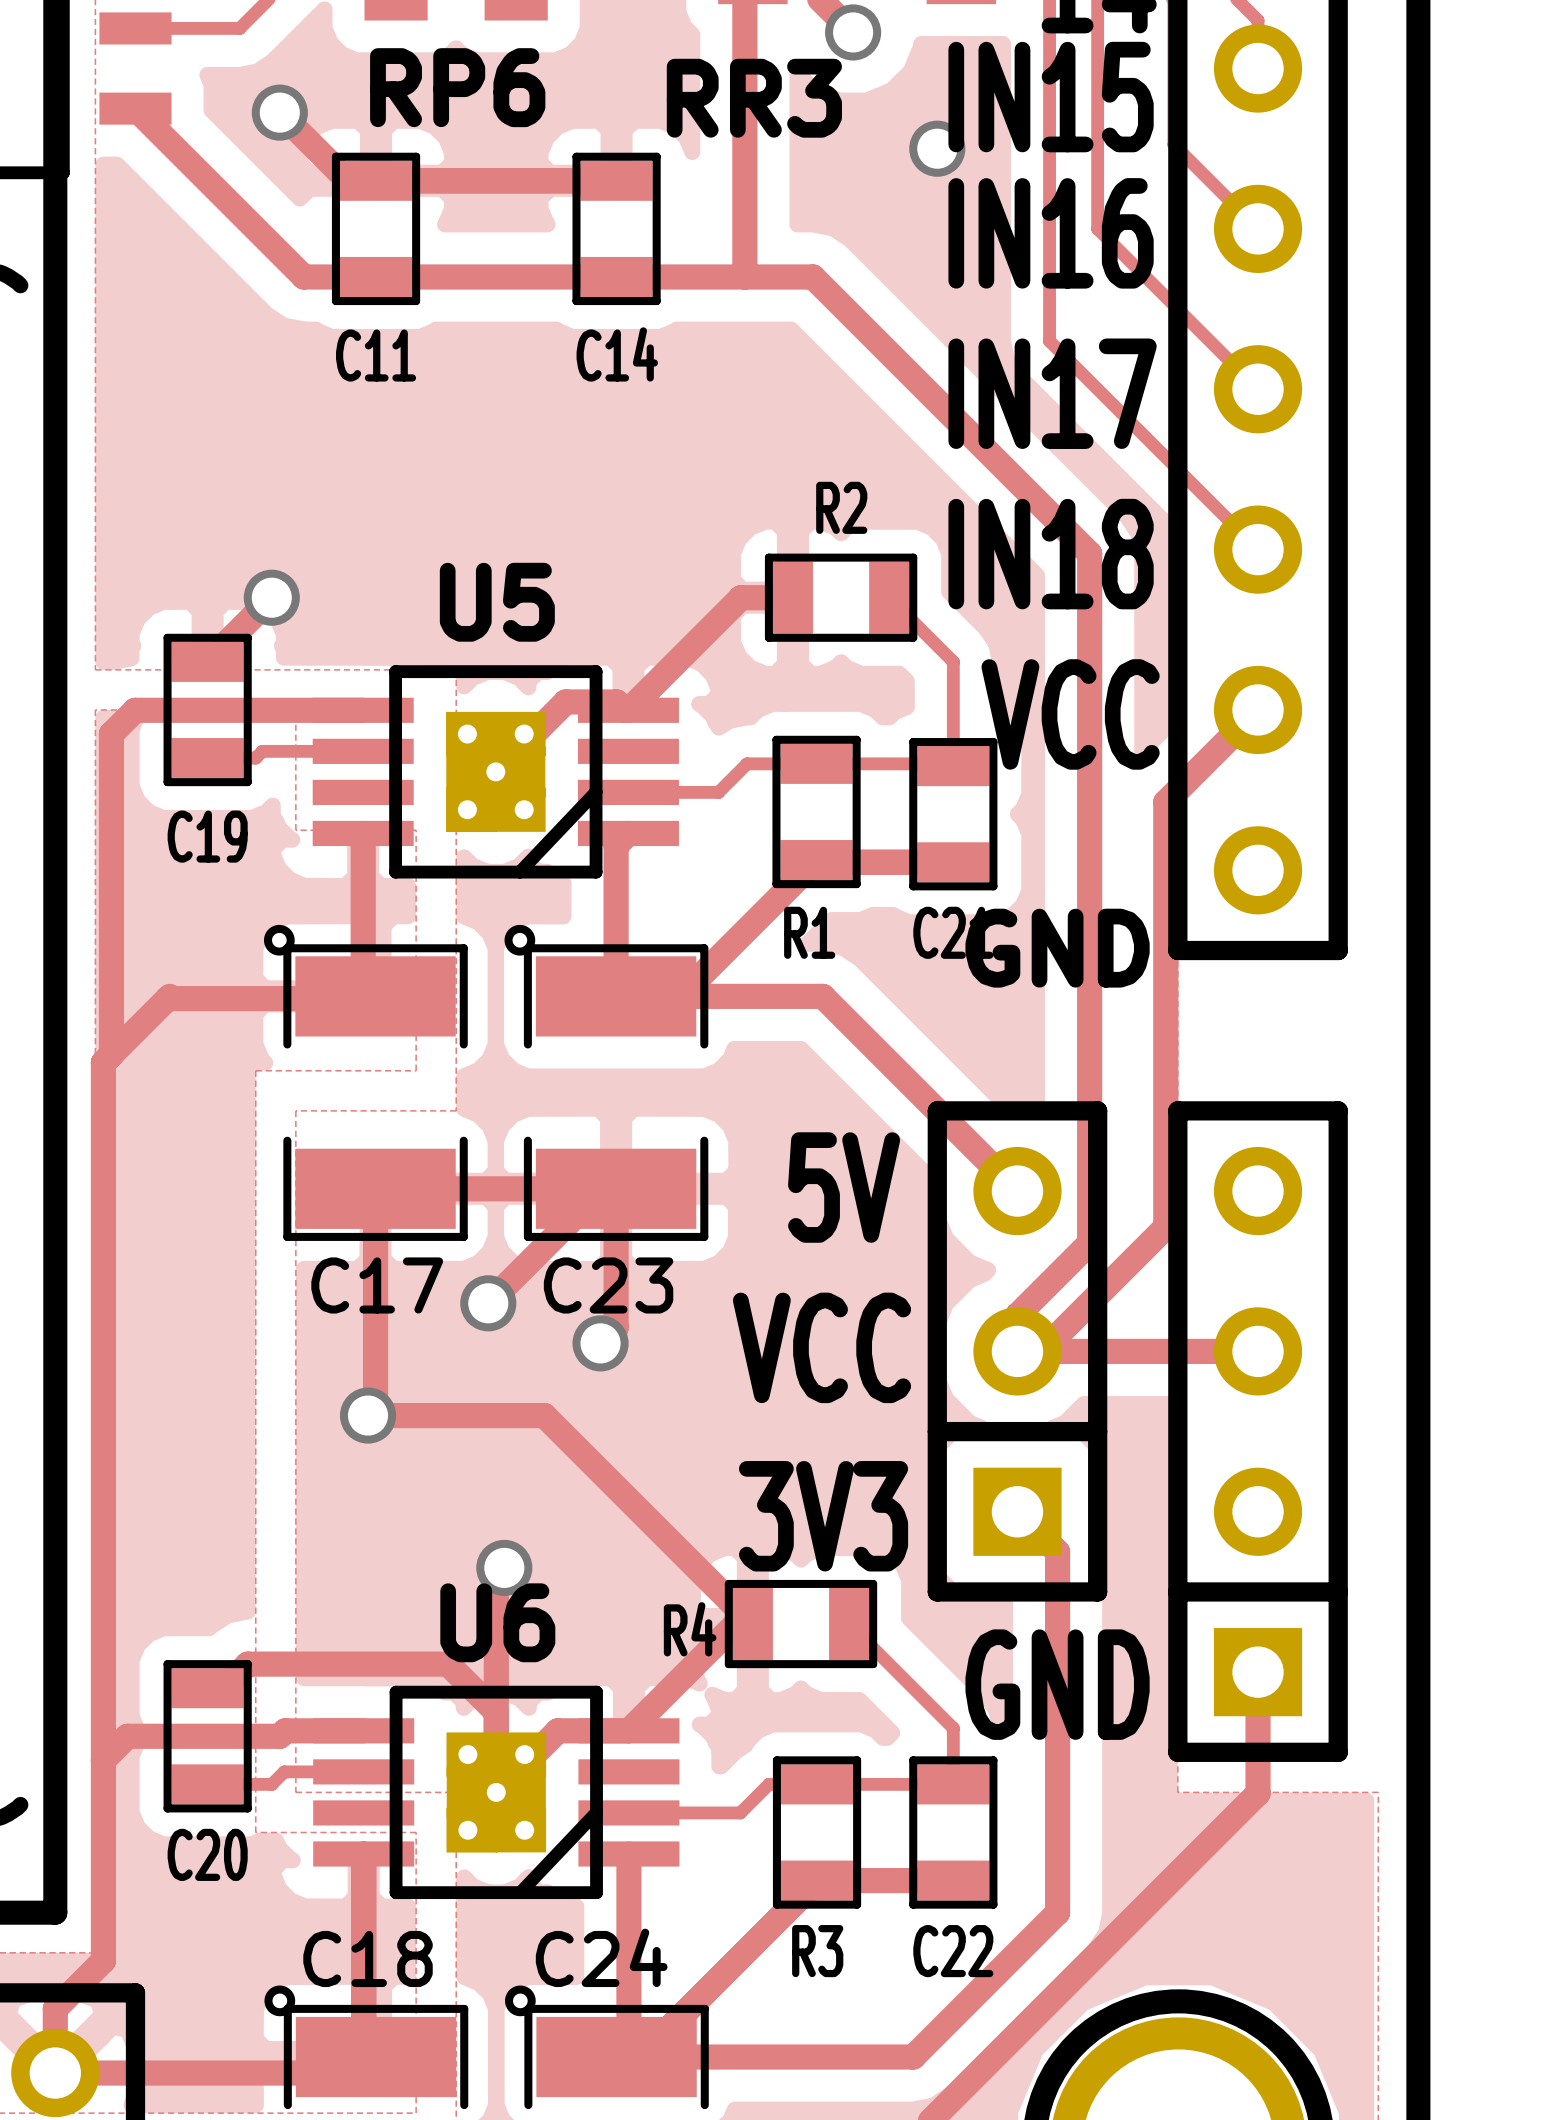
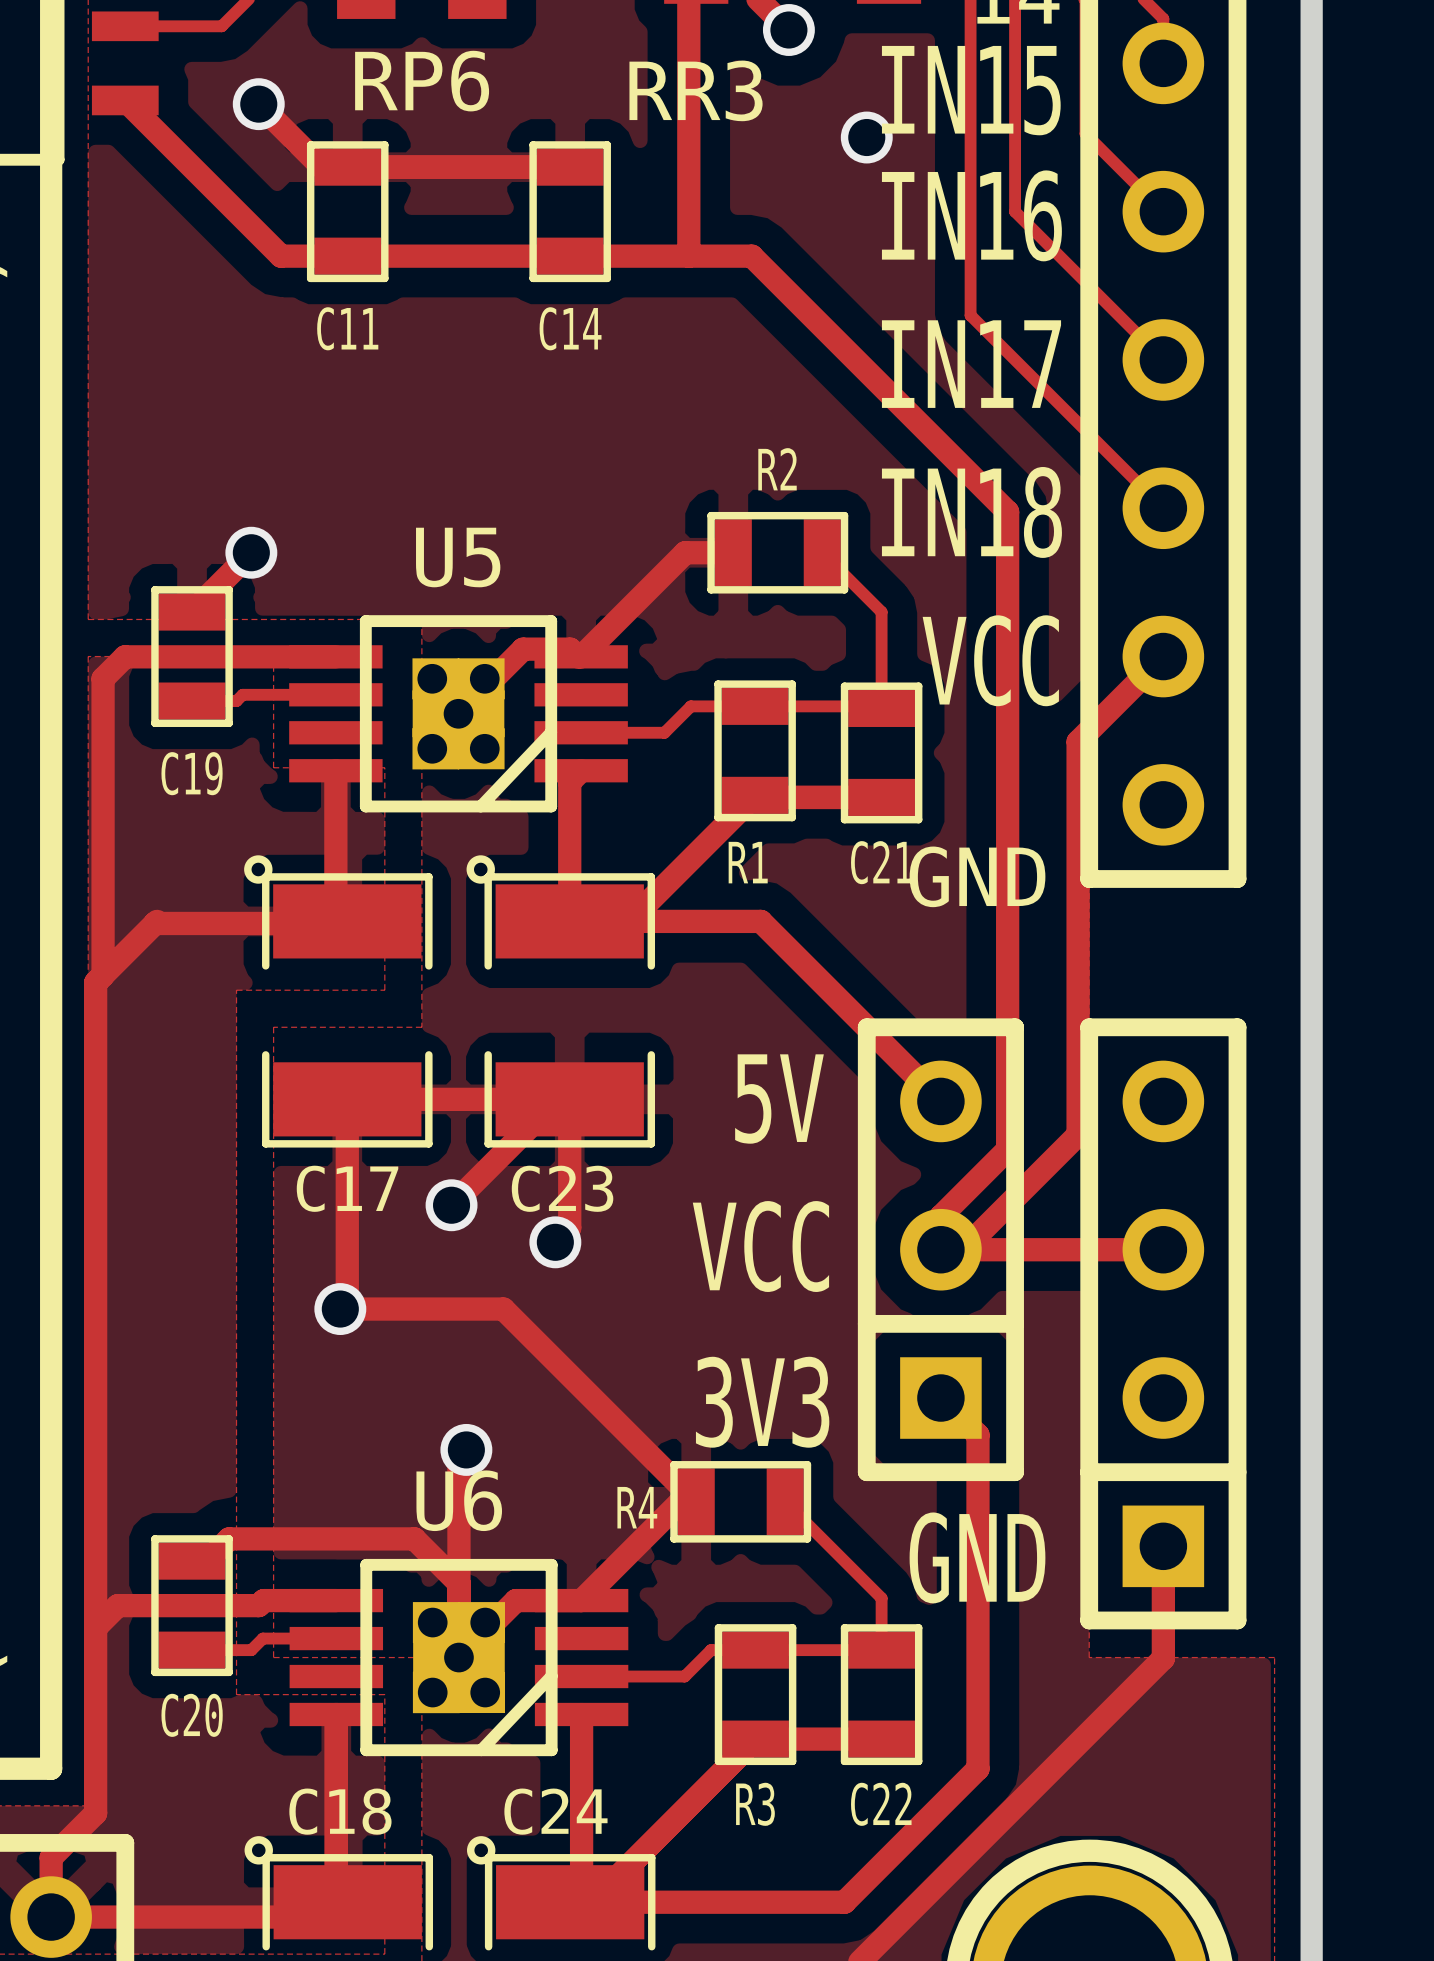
U5 footprint: [312, 665, 679, 879] -> [289, 615, 628, 813]
U6 footprint: [313, 1685, 680, 1900] -> [289, 1558, 629, 1757]

